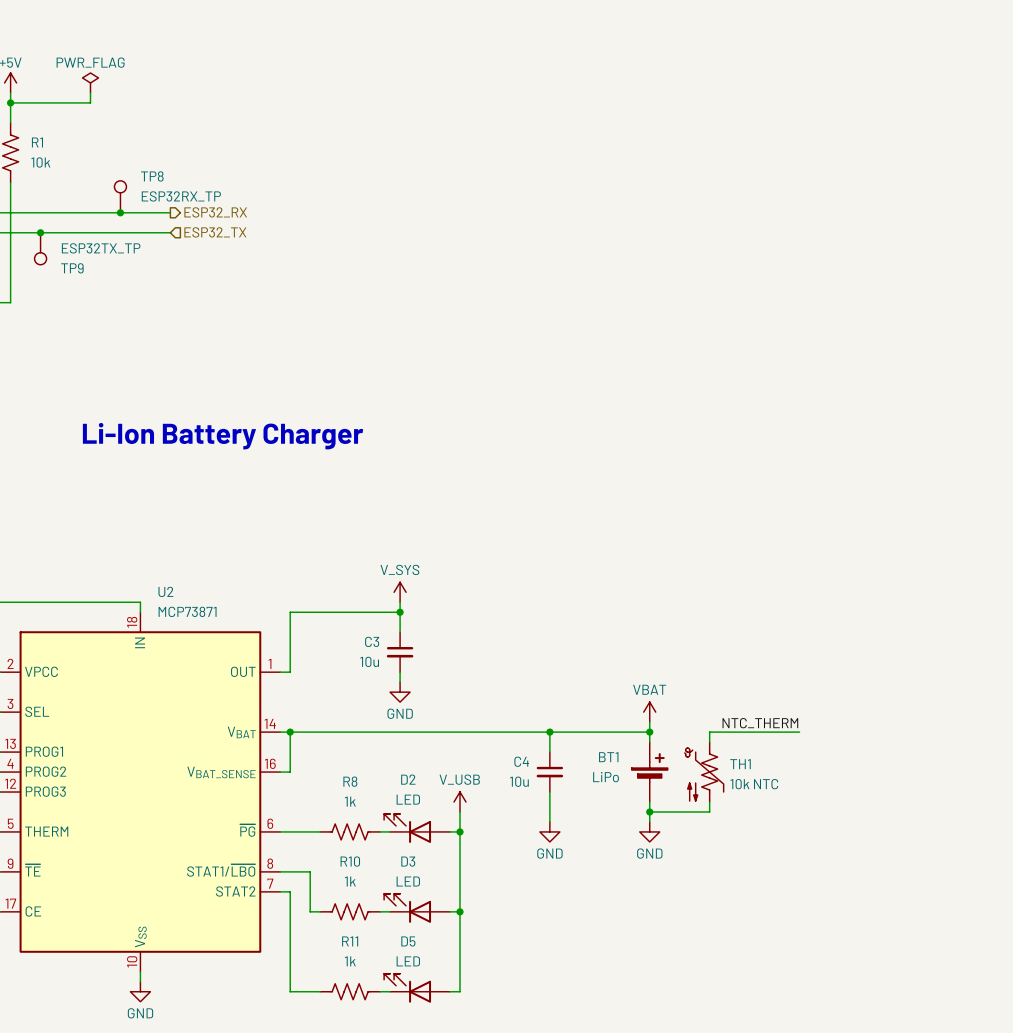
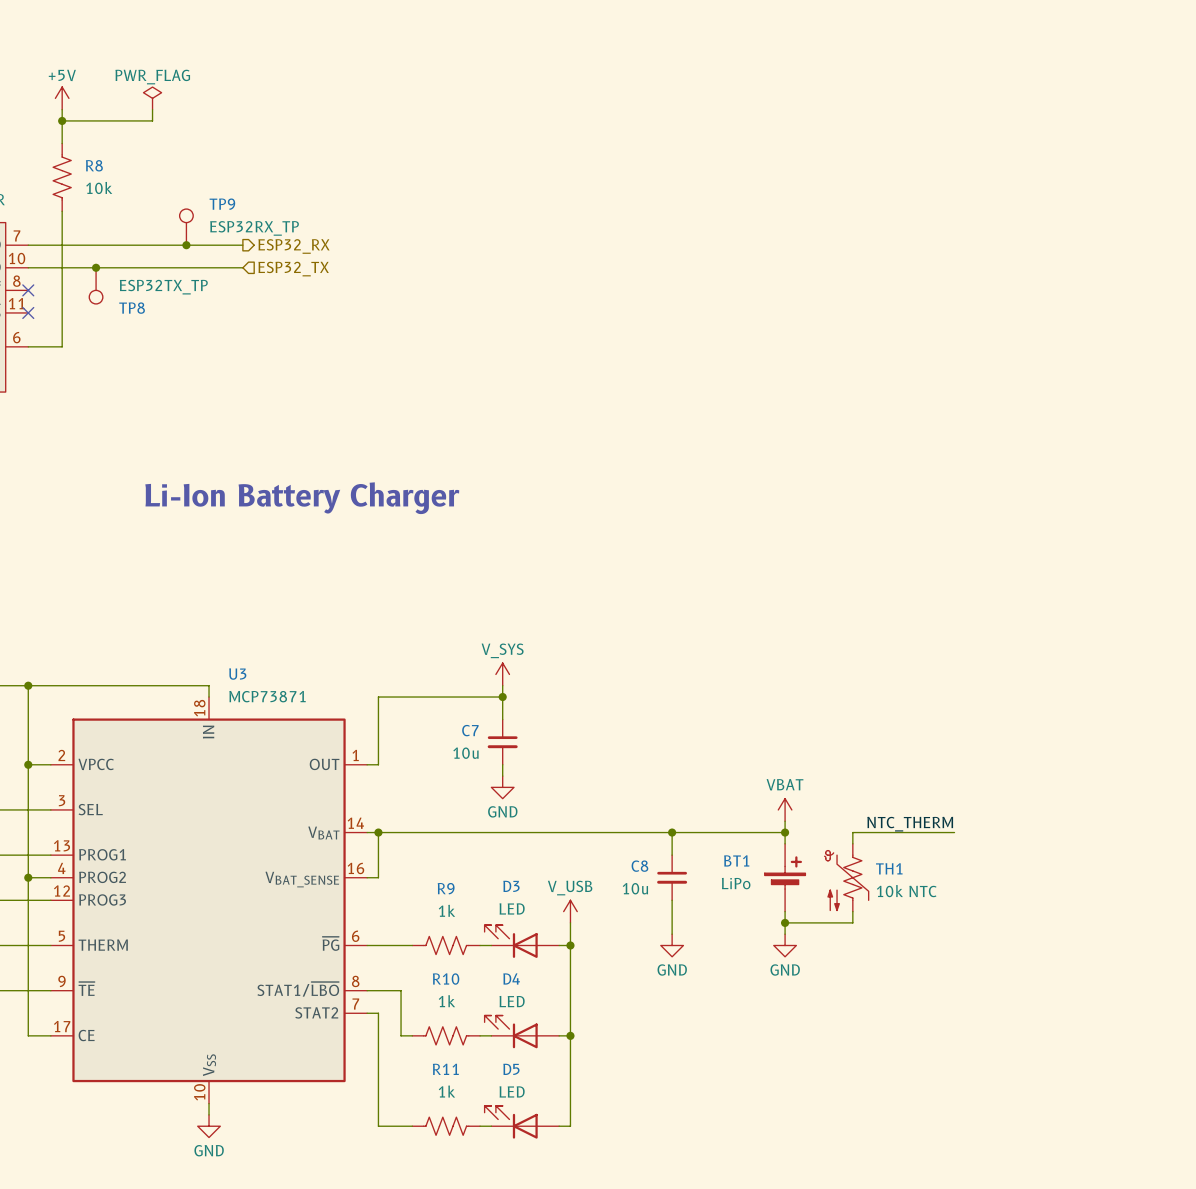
R1 name: R1 (37, 142) -> R8 (94, 165)
TP8 name: TP8 (152, 176) -> TP9 (222, 204)
TP9 name: TP9 (72, 268) -> TP8 (132, 308)
U2 name: U2 (165, 591) -> U3 (237, 674)
C3 name: C3 (372, 641) -> C7 (470, 730)
C4 name: C4 (521, 761) -> C8 (639, 866)
D2 name: D2 (408, 779) -> D3 (511, 886)
R8 name: R8 (350, 781) -> R9 (446, 888)
D3 name: D3 (408, 861) -> D4 (511, 978)

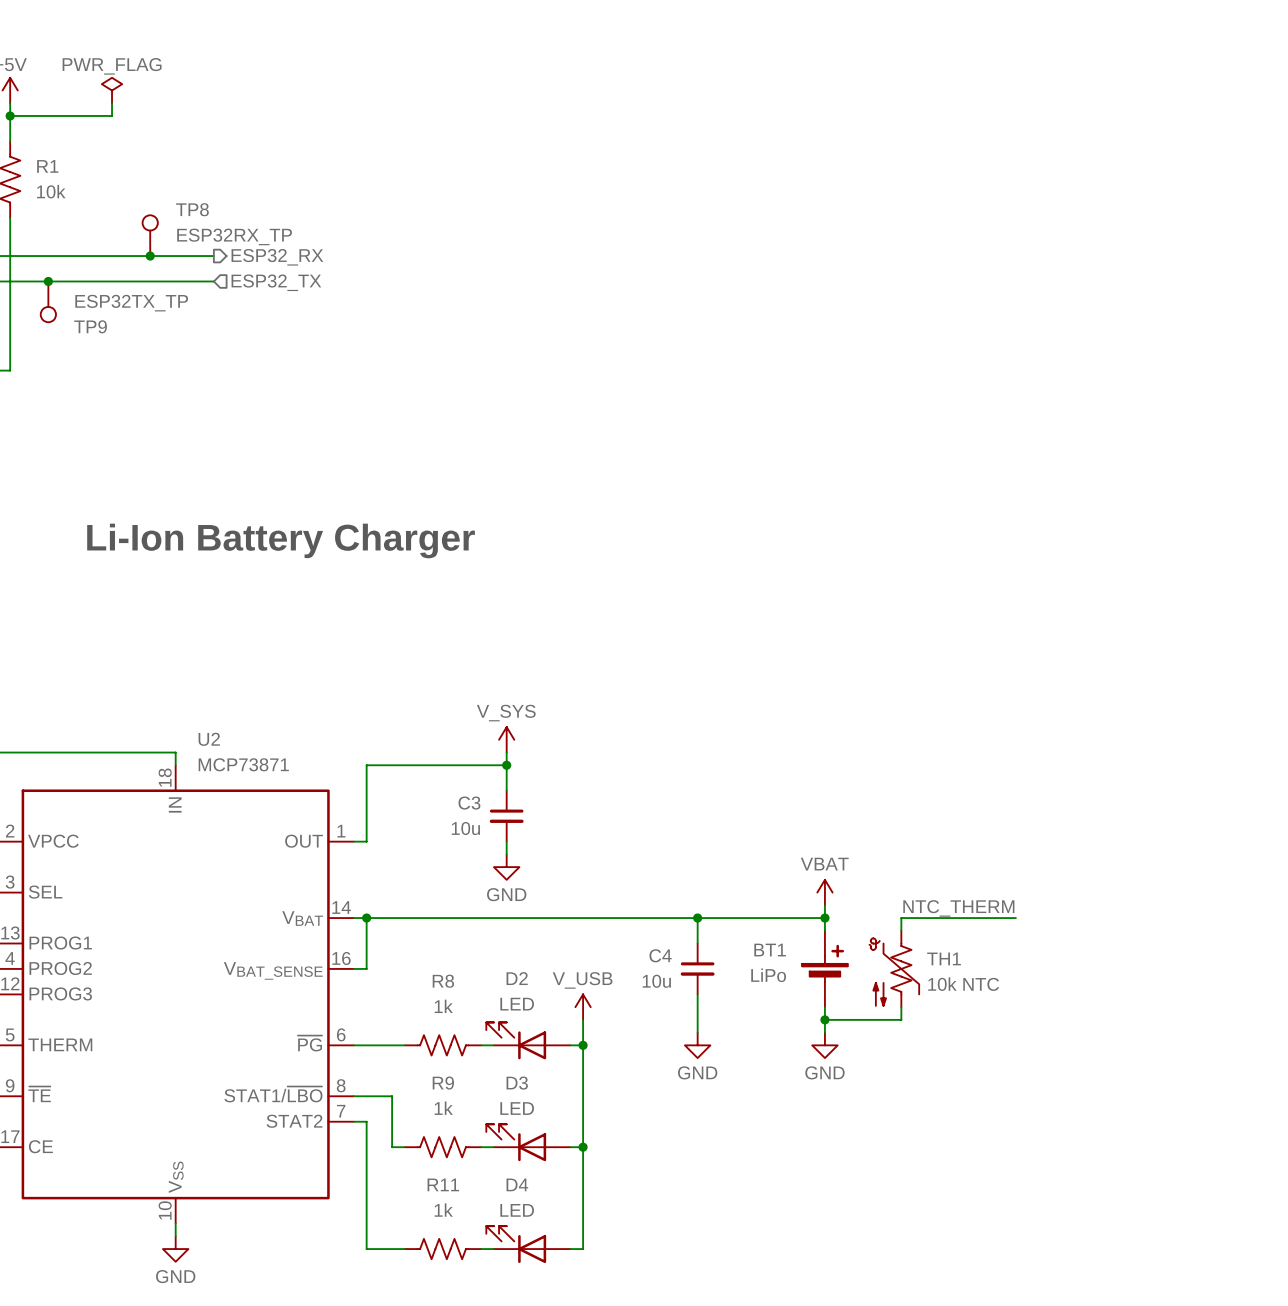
R8 name: R8 (94, 165) -> R1 (47, 166)
TP9 name: TP9 (222, 204) -> TP8 (192, 209)
TP8 name: TP8 (132, 308) -> TP9 (90, 326)
U3 name: U3 (237, 674) -> U2 (209, 739)
C7 name: C7 (470, 730) -> C3 (469, 803)
C8 name: C8 (639, 866) -> C4 (660, 955)
D3 name: D3 (511, 886) -> D2 (517, 978)
R9 name: R9 (446, 888) -> R8 (443, 981)
D4 name: D4 (511, 978) -> D3 (517, 1083)
R10 name: R10 (446, 979) -> R9 (443, 1083)
D5 name: D5 (511, 1069) -> D4 (517, 1184)

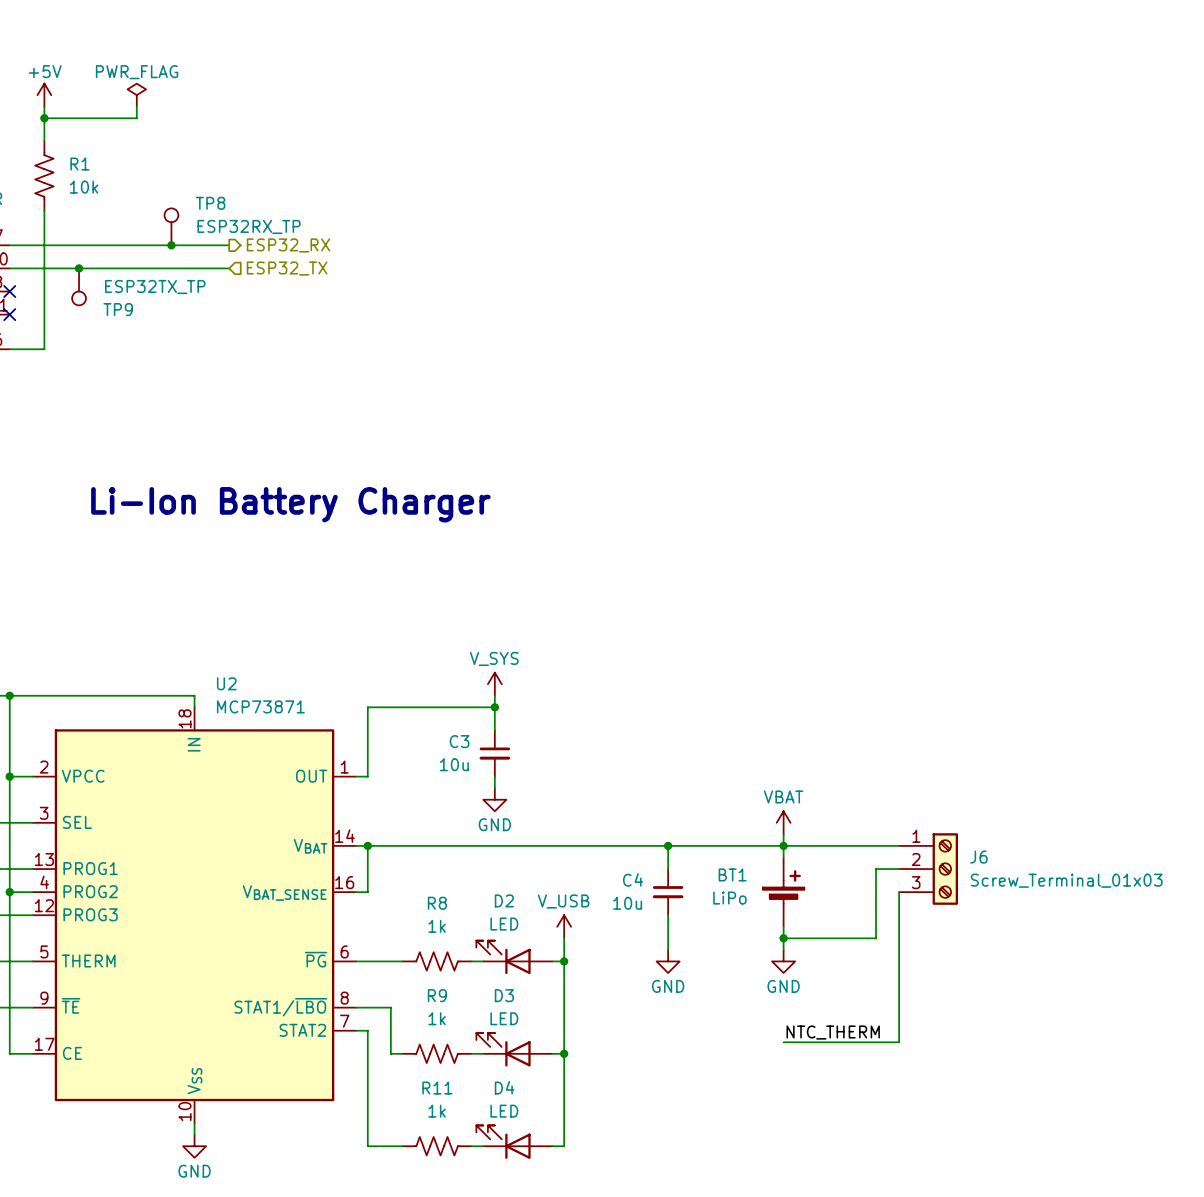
label: NTC_THERM (958, 908) -> none
wire: (901, 918) (901, 930) -> (852, 845) (783, 845)
J6: none -> Screw_Terminal_01x03 (928, 869)
TH1: 10k NTC (894, 968) -> none
wire: none -> (899, 892) (899, 1042) (783, 1042)
wire: (901, 1007) (901, 1019) -> (899, 869) (876, 869) (876, 938) (852, 938)
label: none -> NTC_THERM (833, 1032)

